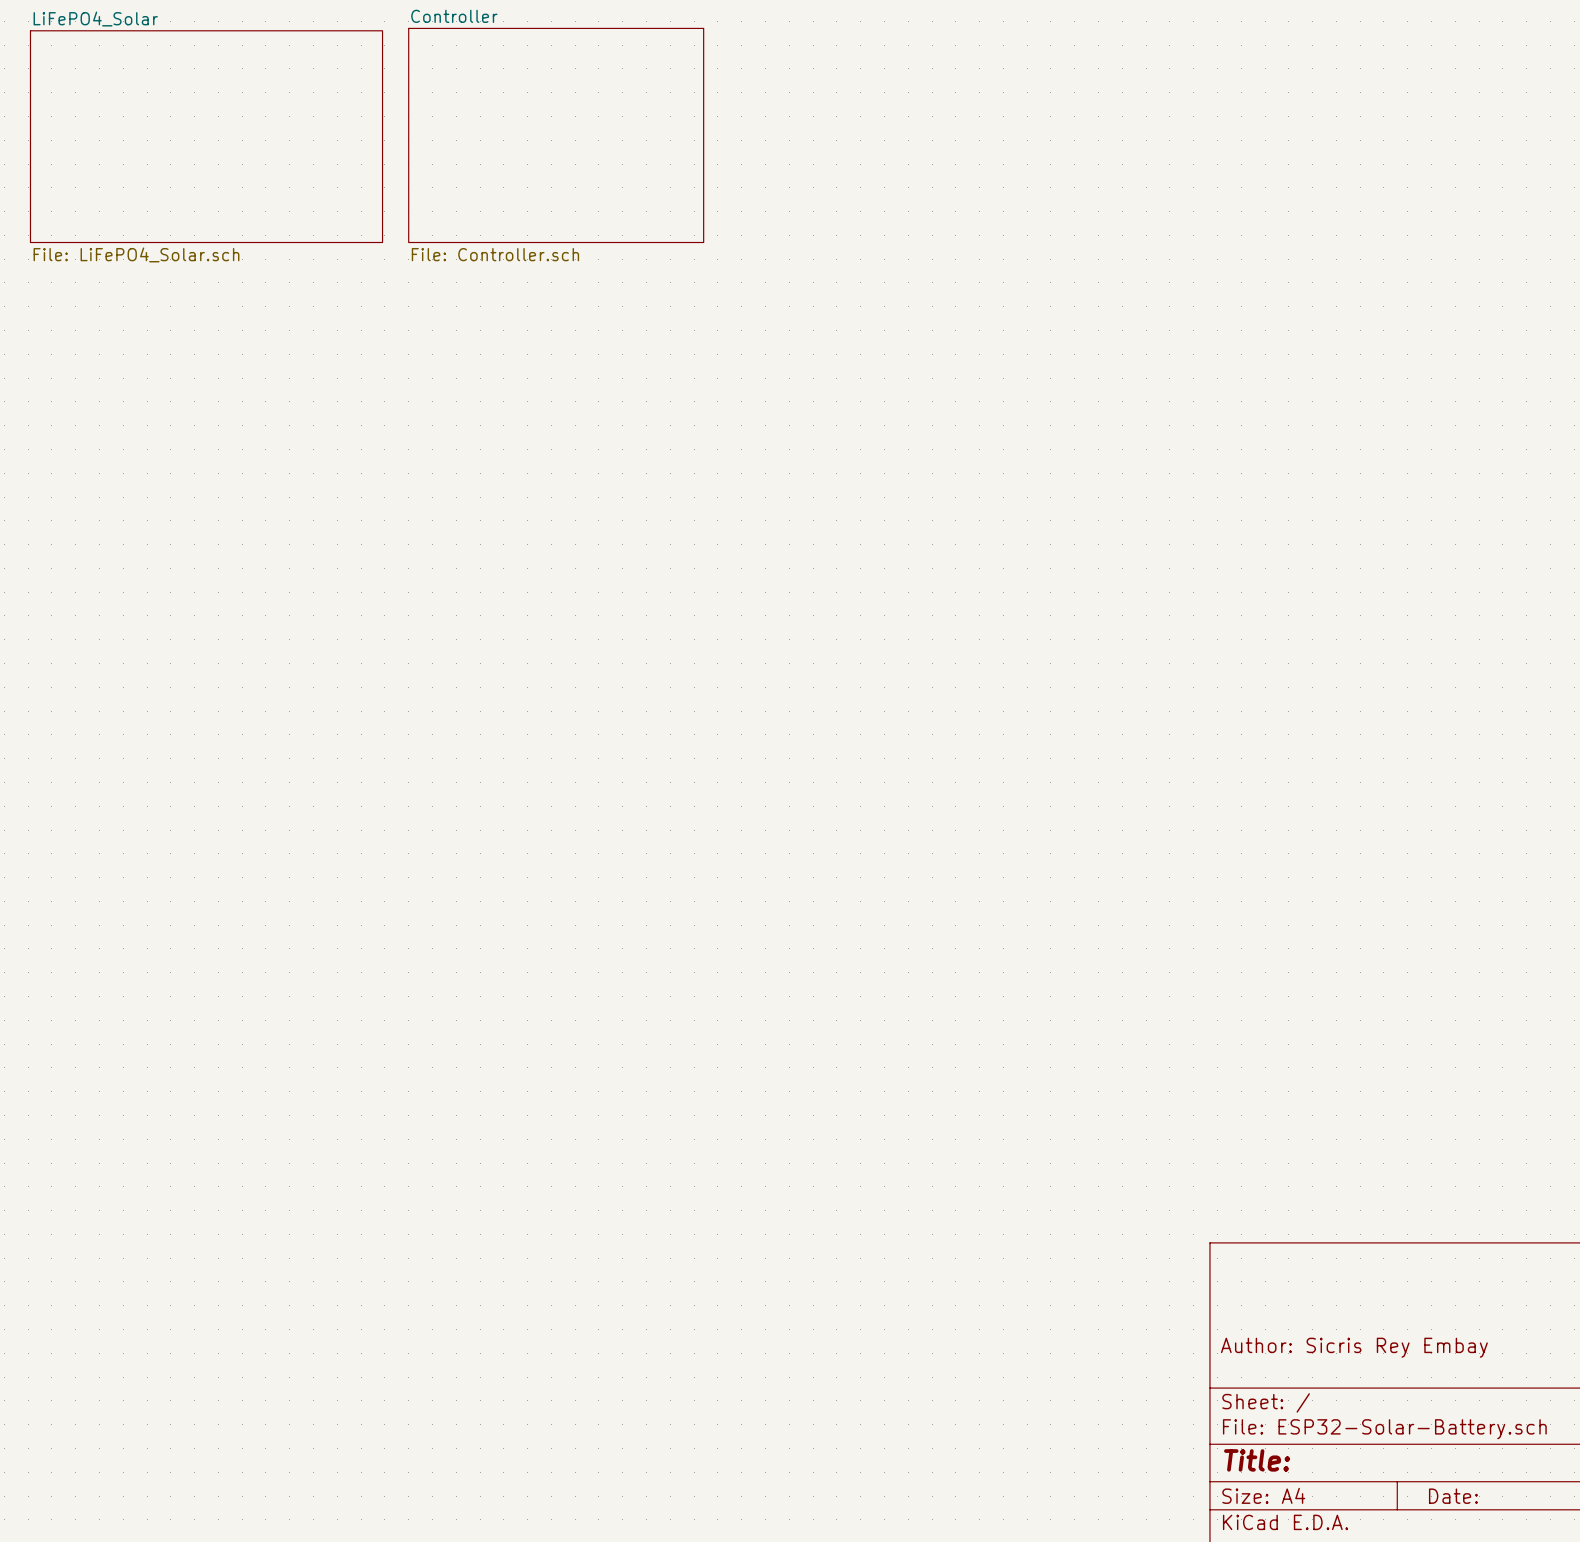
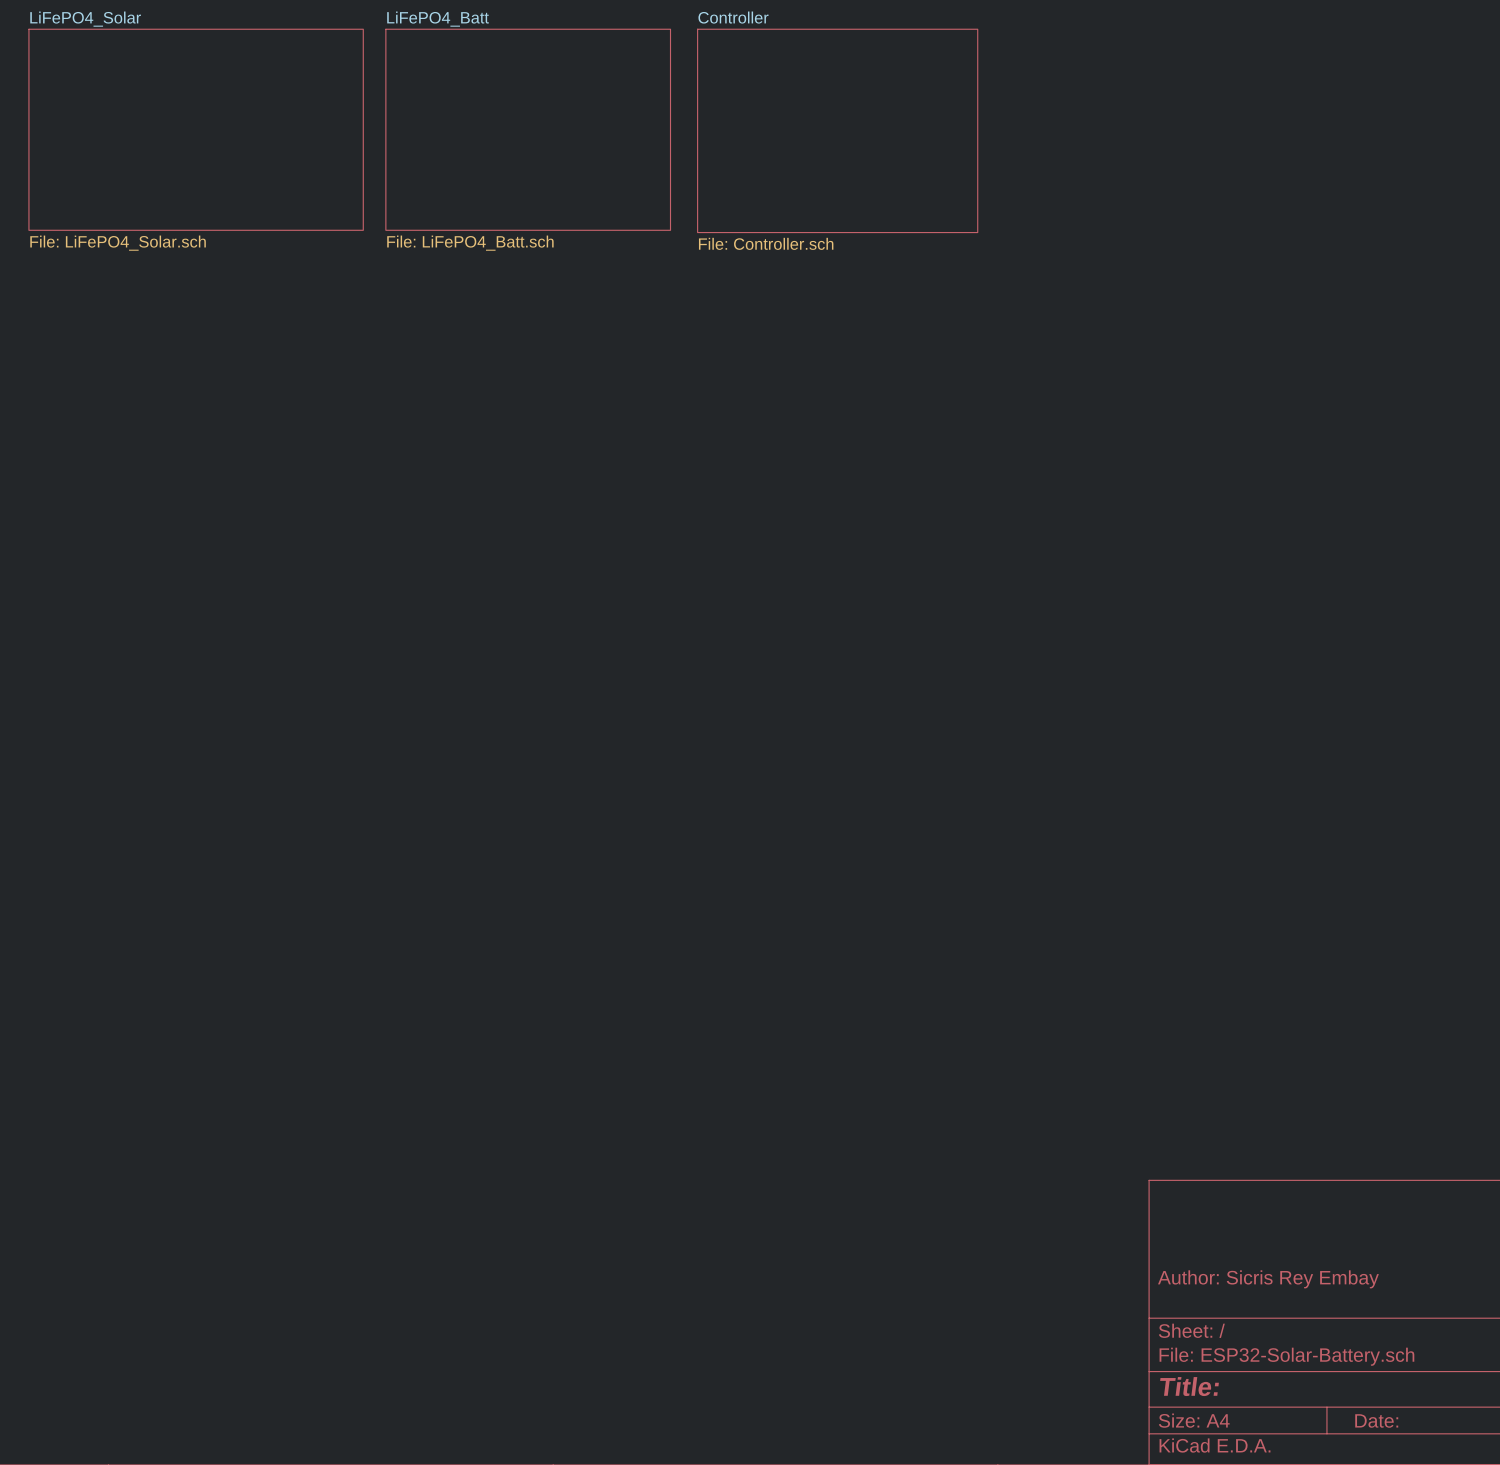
sheet Controller: File: Controller.sch (556, 135) -> none
sheet LiFePO4_Batt: none -> File: LiFePO4_Batt.sch (528, 129)
sheet Controller: none -> File: Controller.sch (837, 130)

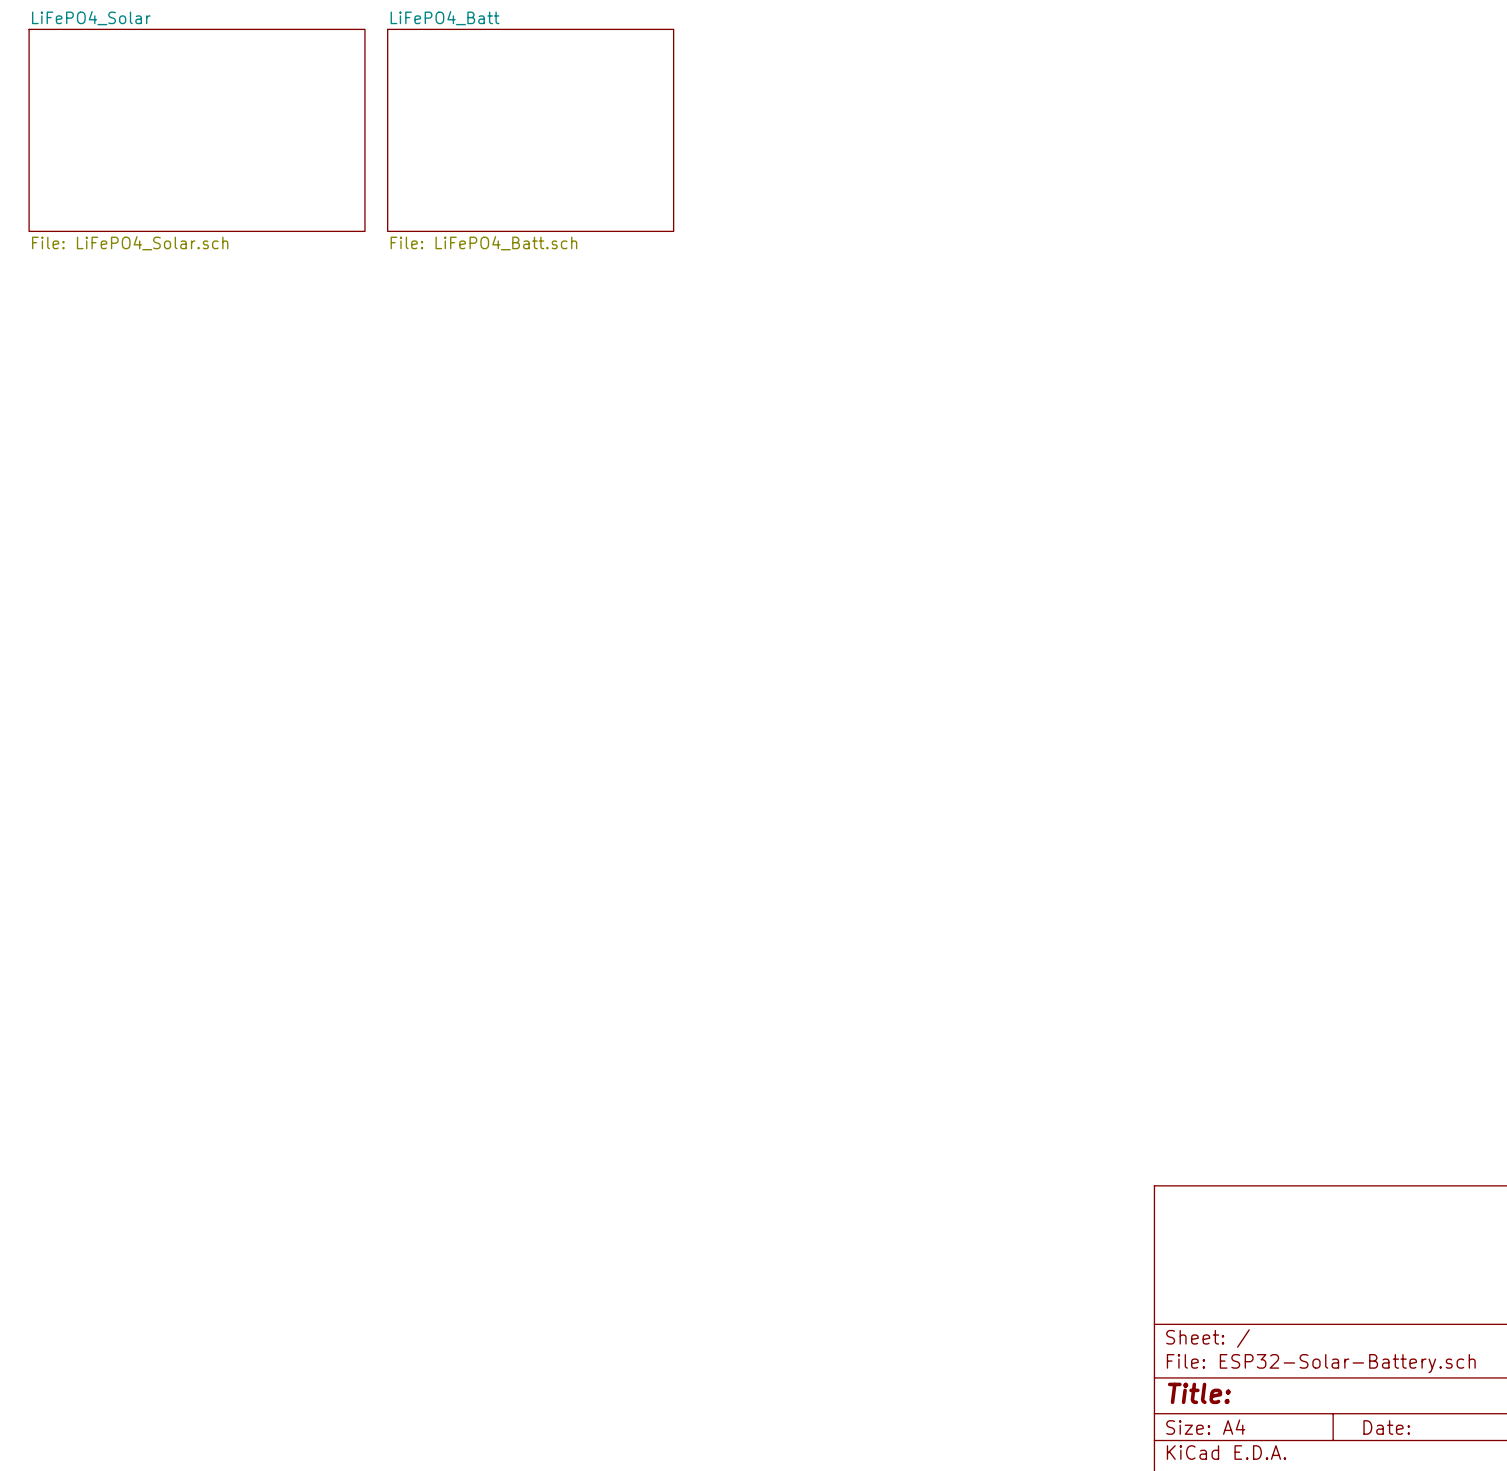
sheet Controller: File: Controller.sch (837, 130) -> none
title block: Author: Sicris Rey Embay (1268, 1279) -> none

